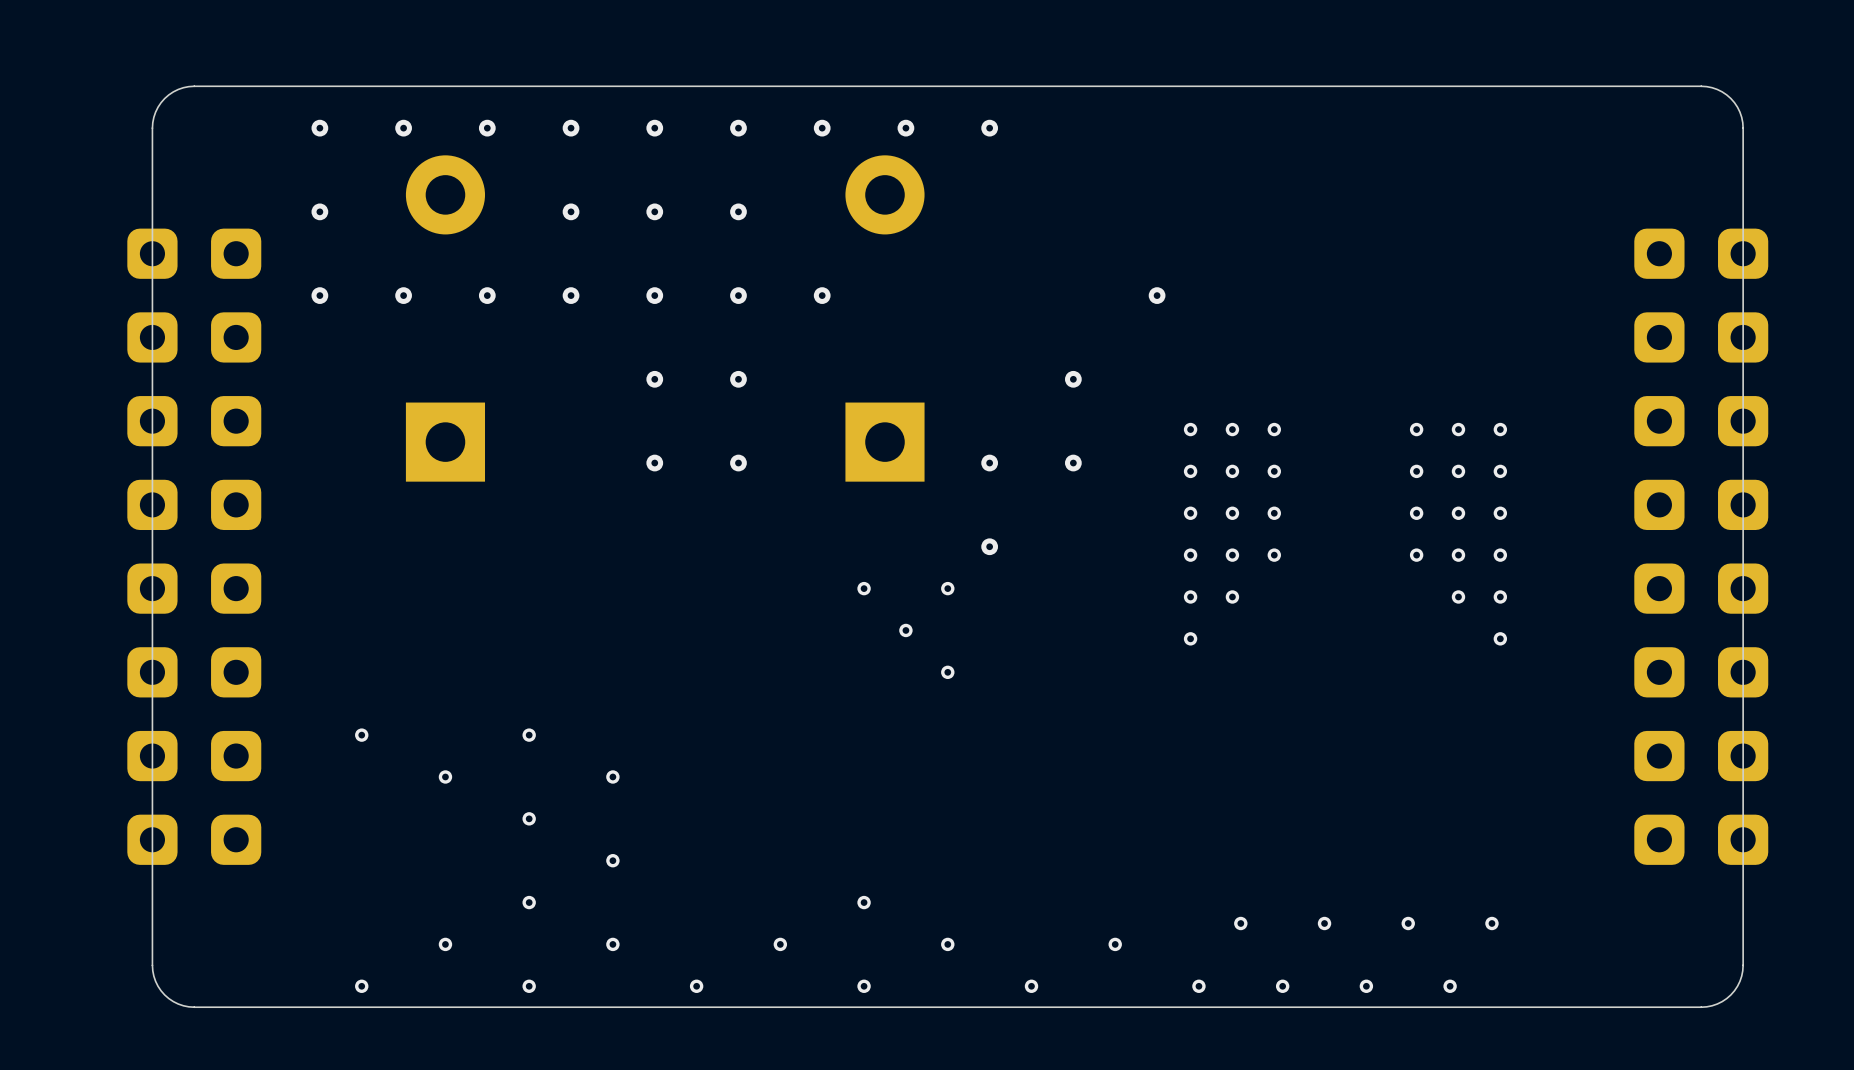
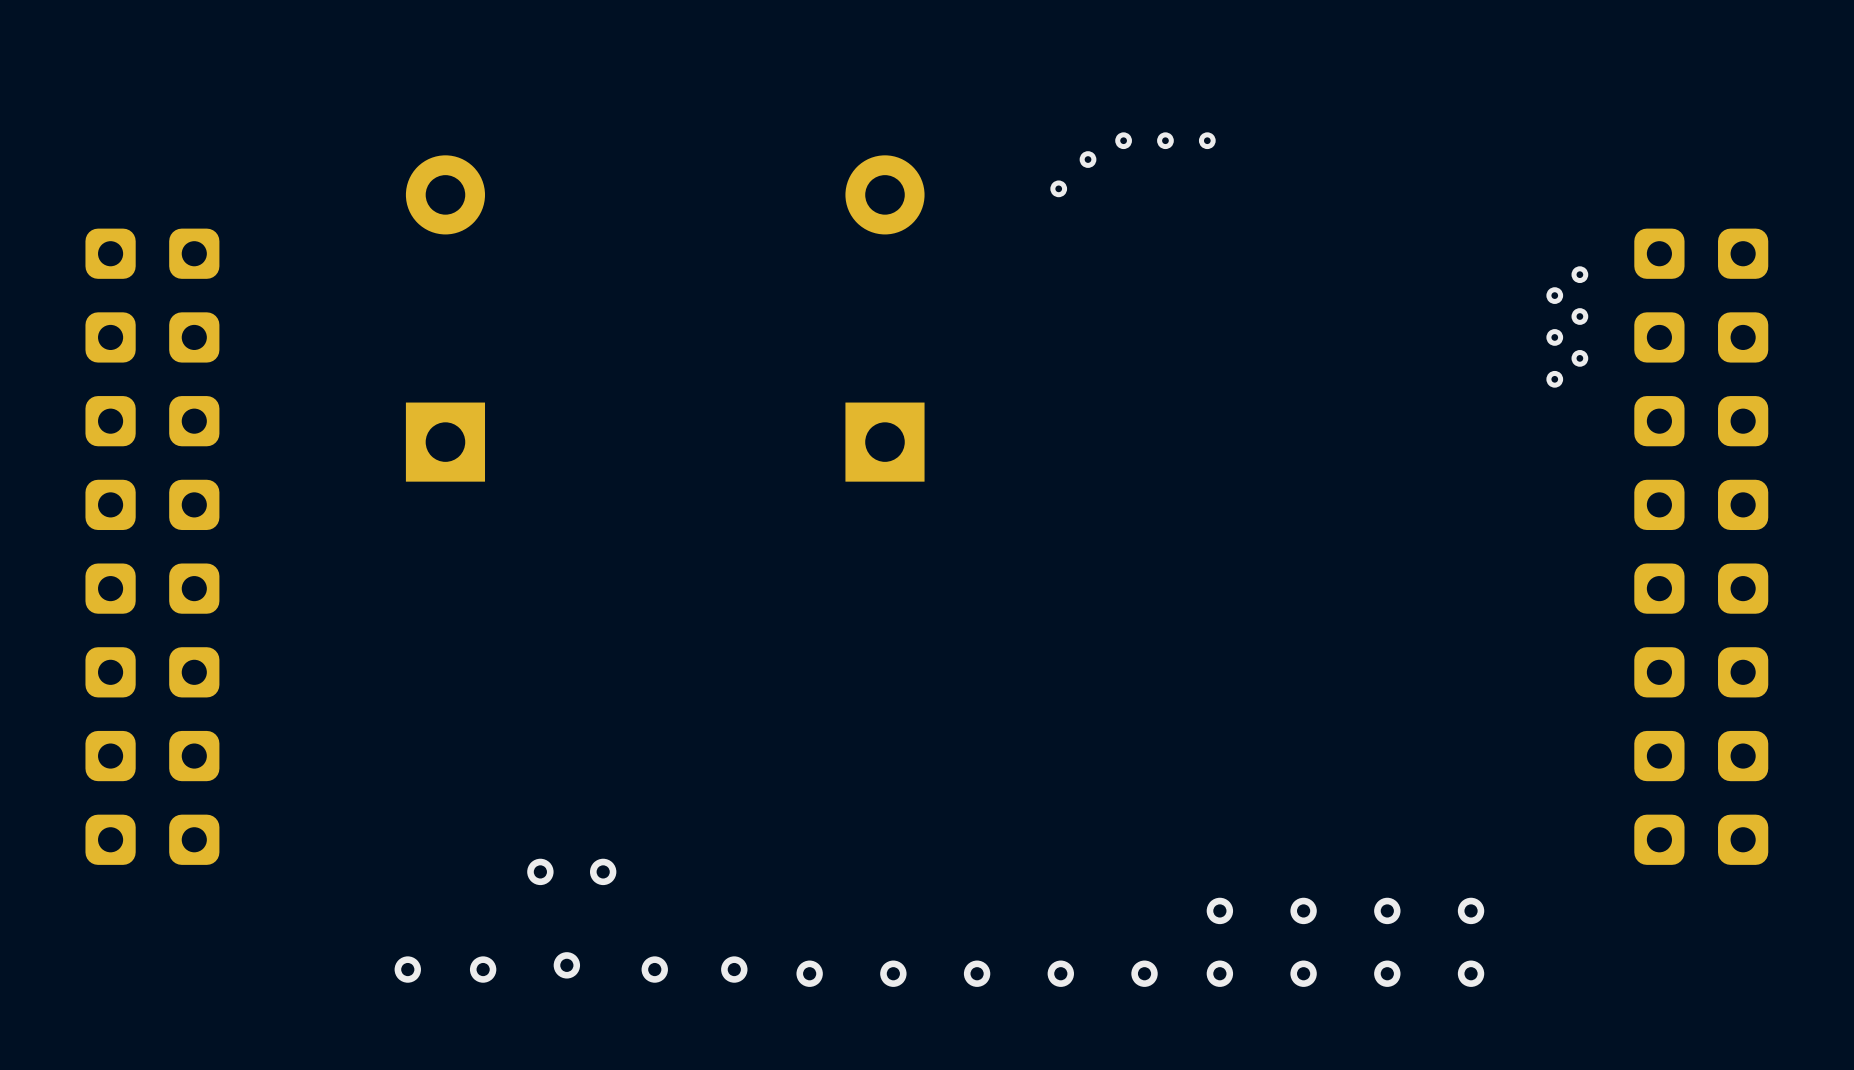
board edge: (1701, 86) (194, 86) (173, 91) (158, 107) (152, 128) (152, 965) (158, 986) (173, 1001) (194, 1007) (1701, 1007) (1722, 1001) (1737, 986) (1743, 965) (1743, 128) (1739, 112) (1730, 98) (1717, 89) (1701, 86) -> none
via: (319, 128) -> none
via: (403, 128) -> none
via: (487, 128) -> none
via: (571, 128) -> none
via: (654, 128) -> none
via: (738, 128) -> none
via: (822, 128) -> none
via: (905, 128) -> none
via: (989, 128) -> none
via: none -> (1123, 140)
via: none -> (1165, 140)
via: none -> (1207, 140)
via: none -> (1088, 159)
via: none -> (1058, 188)
via: (319, 211) -> none
via: (571, 211) -> none
via: (654, 211) -> none
via: (738, 211) -> none
via: none -> (1579, 274)
via: (319, 295) -> none
via: (403, 295) -> none
via: (487, 295) -> none
via: (571, 295) -> none
via: (654, 295) -> none
via: (738, 295) -> none
via: (822, 295) -> none
via: (1157, 295) -> none
via: none -> (1554, 295)
via: none -> (1579, 316)
via: none -> (1554, 337)
via: none -> (1579, 358)
via: (654, 379) -> none
via: (738, 379) -> none
via: (1073, 379) -> none
via: none -> (1554, 379)
via: (1190, 429) -> none
via: (1232, 429) -> none
via: (1274, 429) -> none
via: (1416, 429) -> none
via: (1458, 429) -> none
via: (1500, 429) -> none
via: (654, 463) -> none
via: (738, 463) -> none
via: (989, 463) -> none
via: (1073, 463) -> none
via: (1190, 471) -> none
via: (1232, 471) -> none
via: (1274, 471) -> none
via: (1416, 471) -> none
via: (1458, 471) -> none
via: (1500, 471) -> none
via: (1190, 513) -> none
via: (1232, 513) -> none
via: (1274, 513) -> none
via: (1416, 513) -> none
via: (1458, 513) -> none
via: (1500, 513) -> none
part position: (194, 546) -> (152, 546)
via: (989, 546) -> none
via: (1190, 555) -> none
via: (1232, 555) -> none
via: (1274, 555) -> none
via: (1416, 555) -> none
via: (1458, 555) -> none
via: (1500, 555) -> none
via: (864, 588) -> none
via: (947, 588) -> none
via: (1190, 596) -> none
via: (1232, 596) -> none
via: (1458, 596) -> none
via: (1500, 596) -> none
via: (905, 630) -> none
via: (1190, 638) -> none
via: (1500, 638) -> none
via: (947, 672) -> none
via: (361, 735) -> none
via: (529, 735) -> none
via: (445, 776) -> none
via: (612, 776) -> none
via: (529, 818) -> none
via size: [606, 854, 620, 868] -> [589, 858, 617, 886]
via: none -> (540, 871)
via: (529, 902) -> none
via: (864, 902) -> none
via: none -> (1219, 910)
via: none -> (1303, 910)
via: none -> (1387, 910)
via: none -> (1471, 910)
via: (1240, 923) -> none
via: (1324, 923) -> none
via: (1408, 923) -> none
via: (1491, 923) -> none
via: (445, 944) -> none
via: (612, 944) -> none
via: (780, 944) -> none
via: (947, 944) -> none
via: (1115, 944) -> none
via: none -> (566, 965)
via: none -> (407, 969)
via: none -> (483, 969)
via: none -> (654, 969)
via: none -> (734, 969)
via: none -> (809, 973)
via: none -> (893, 973)
via: none -> (977, 973)
via: none -> (1060, 973)
via: none -> (1144, 973)
via: none -> (1219, 973)
via: none -> (1303, 973)
via: none -> (1387, 973)
via: none -> (1471, 973)
via: (361, 986) -> none
via: (529, 986) -> none
via: (696, 986) -> none
via: (864, 986) -> none
via: (1031, 986) -> none
via: (1198, 986) -> none
via: (1282, 986) -> none
via: (1366, 986) -> none
via: (1450, 986) -> none

